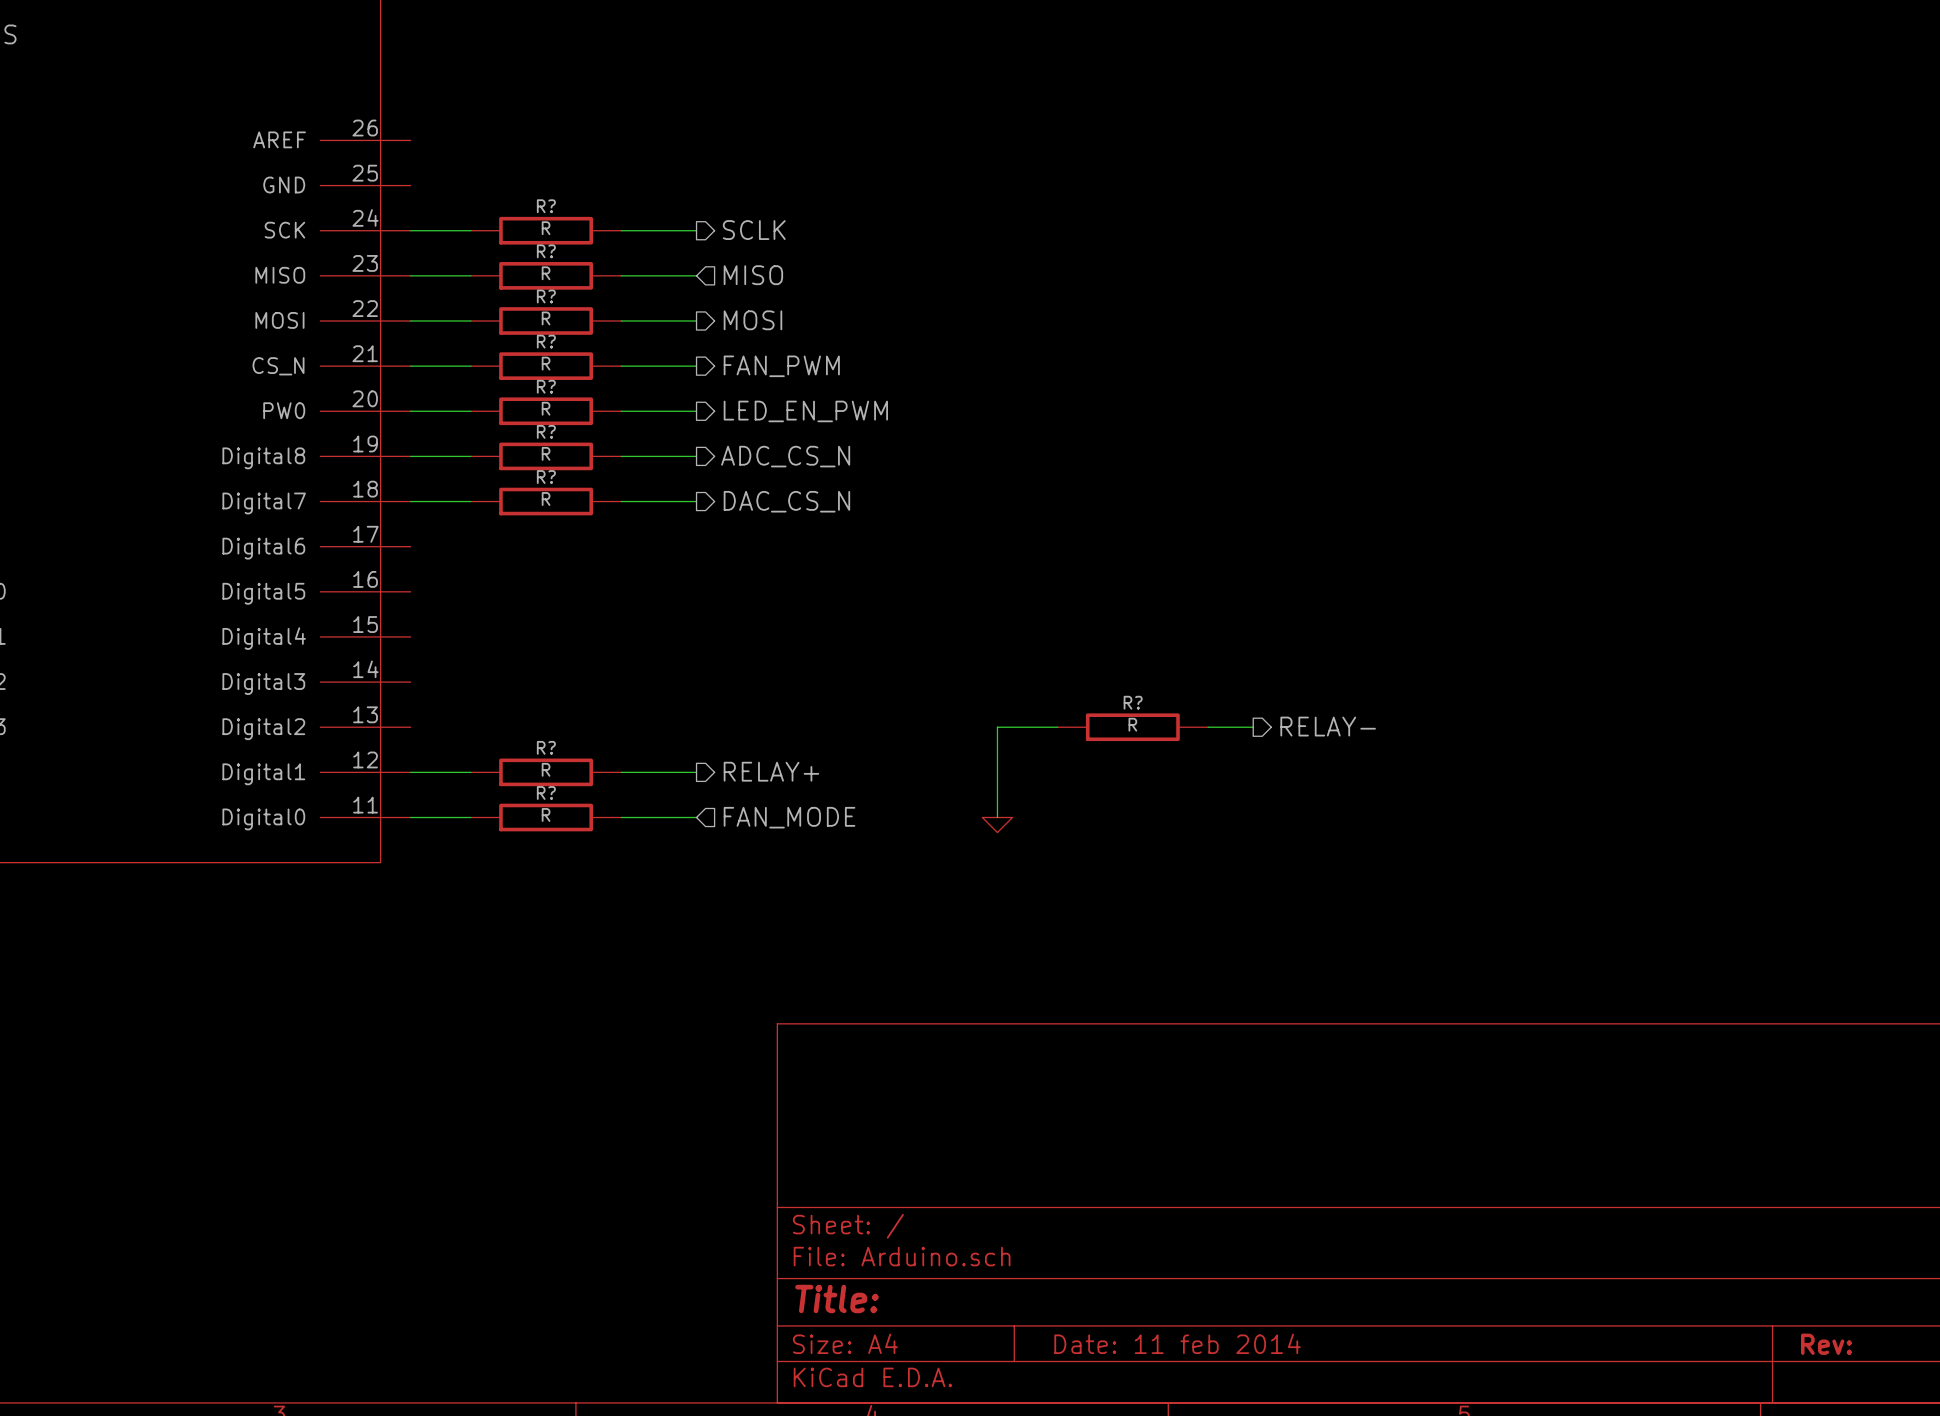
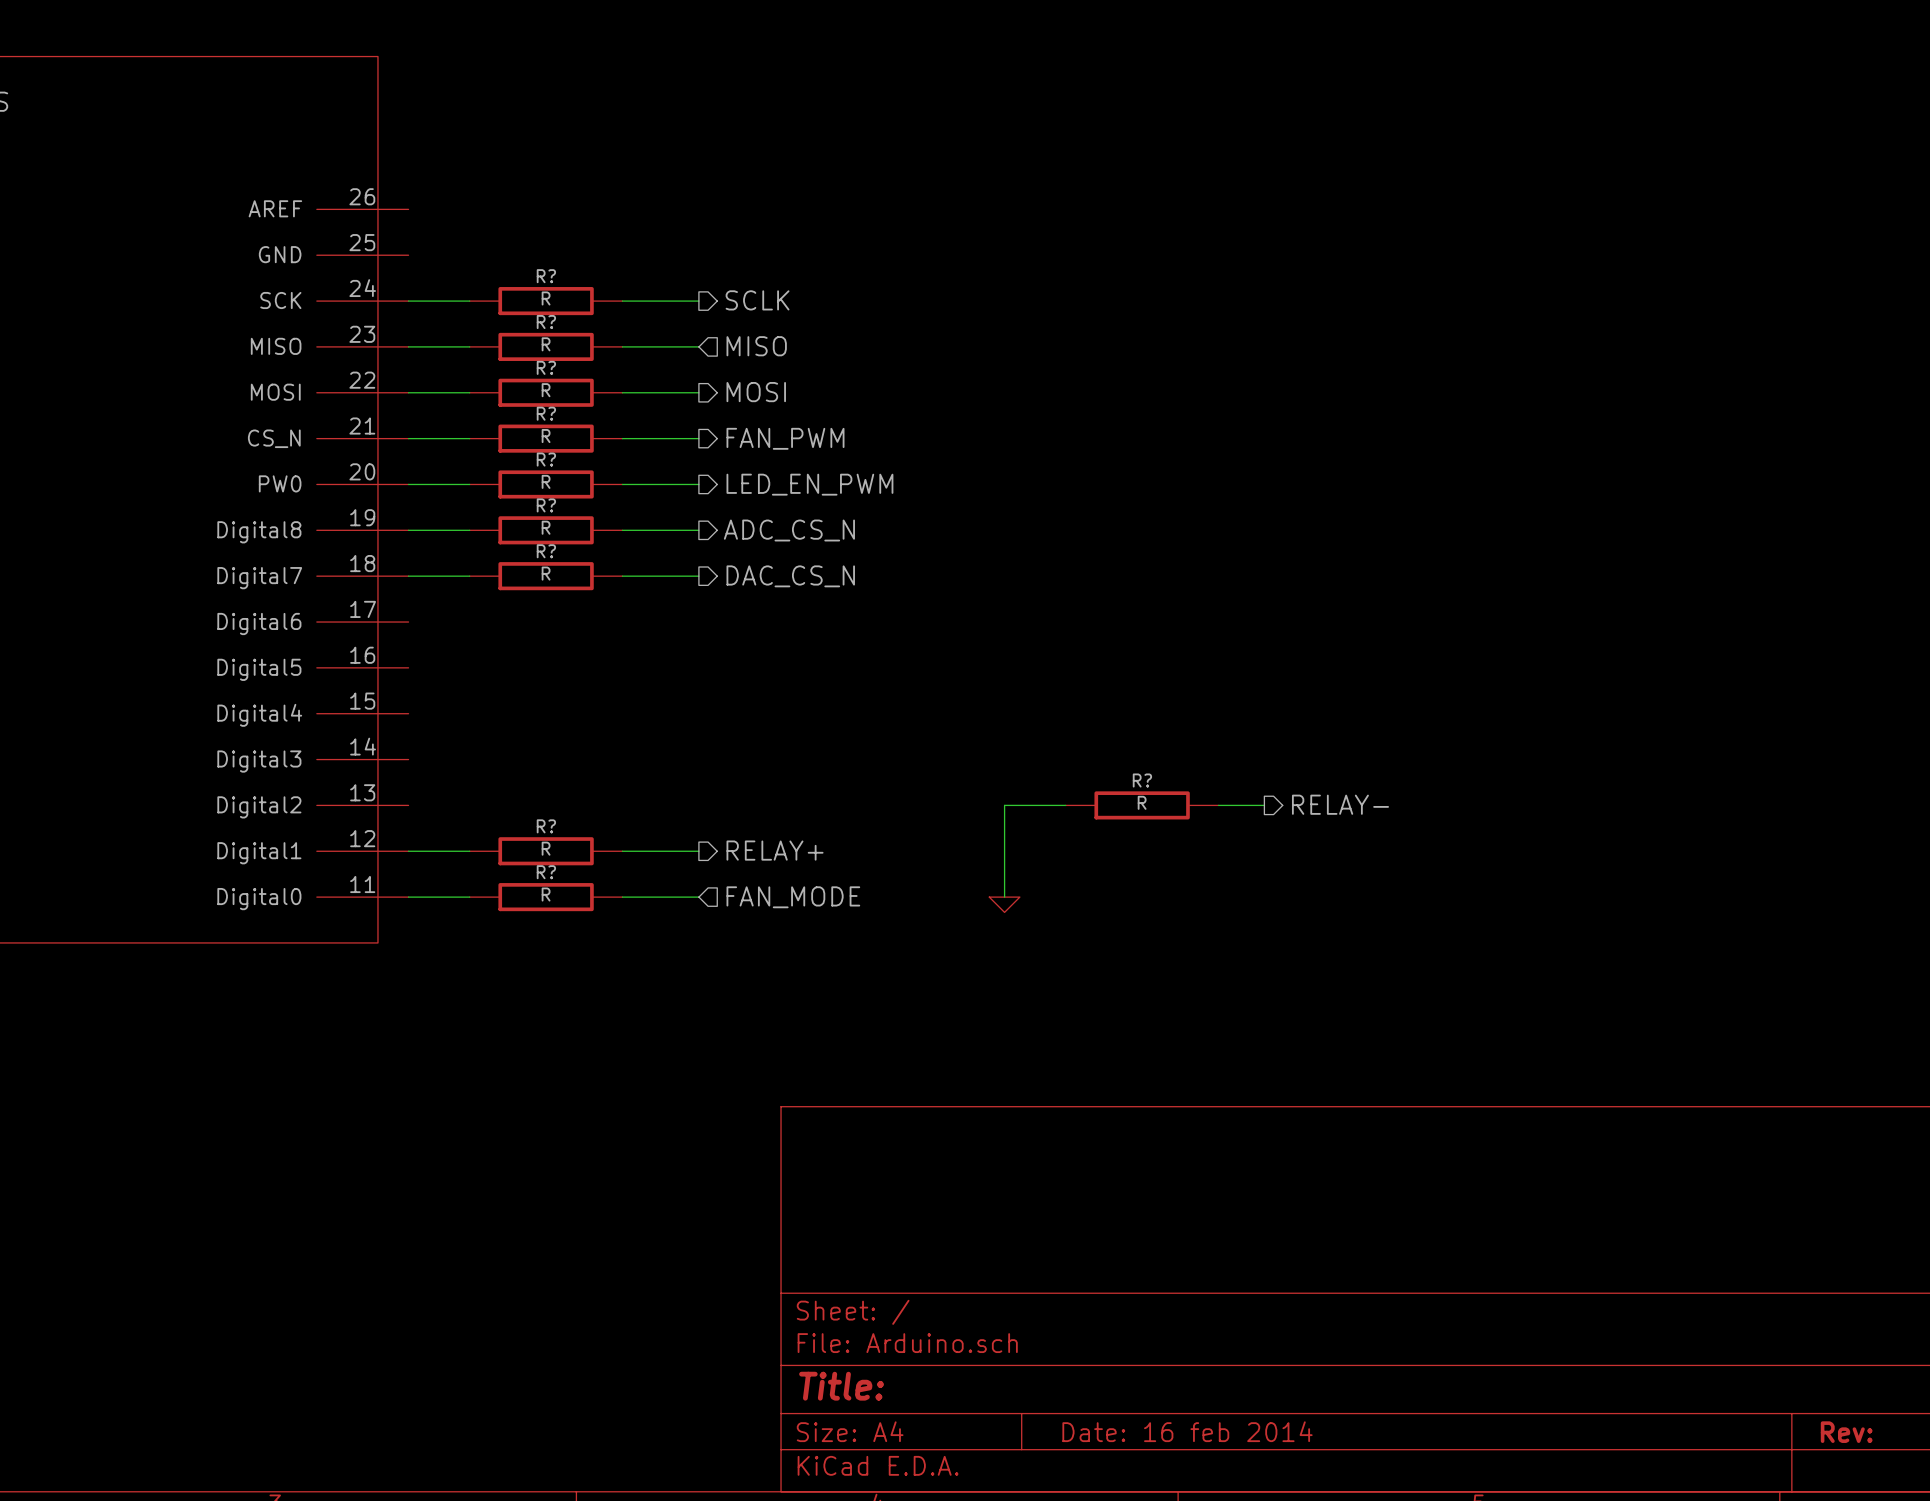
title block: Date: 11 feb 2014 (1177, 1343) -> Date: 16 feb 2014 (1187, 1431)

